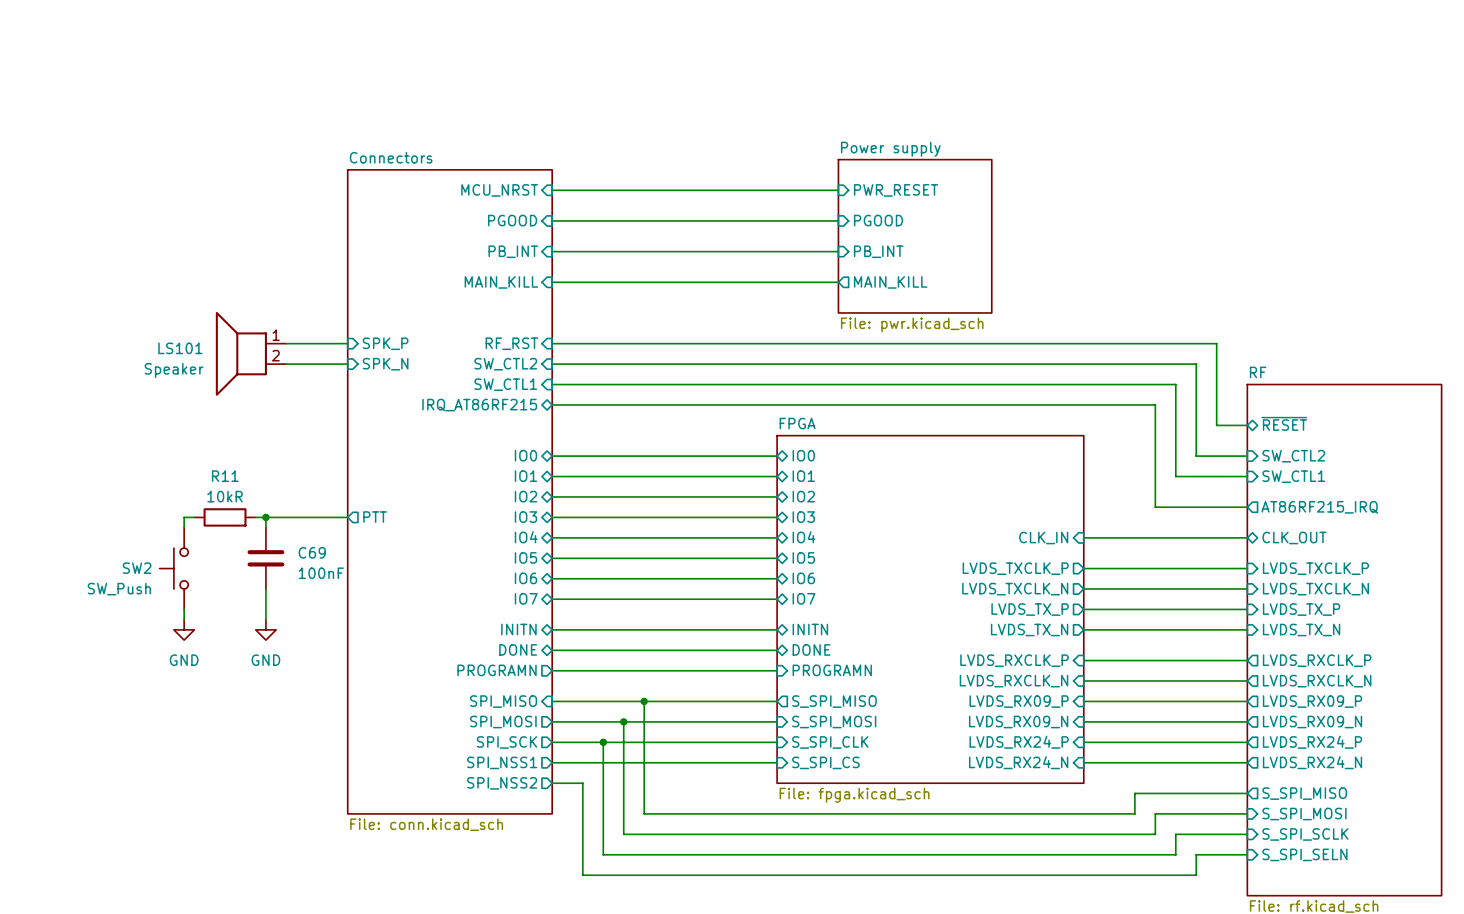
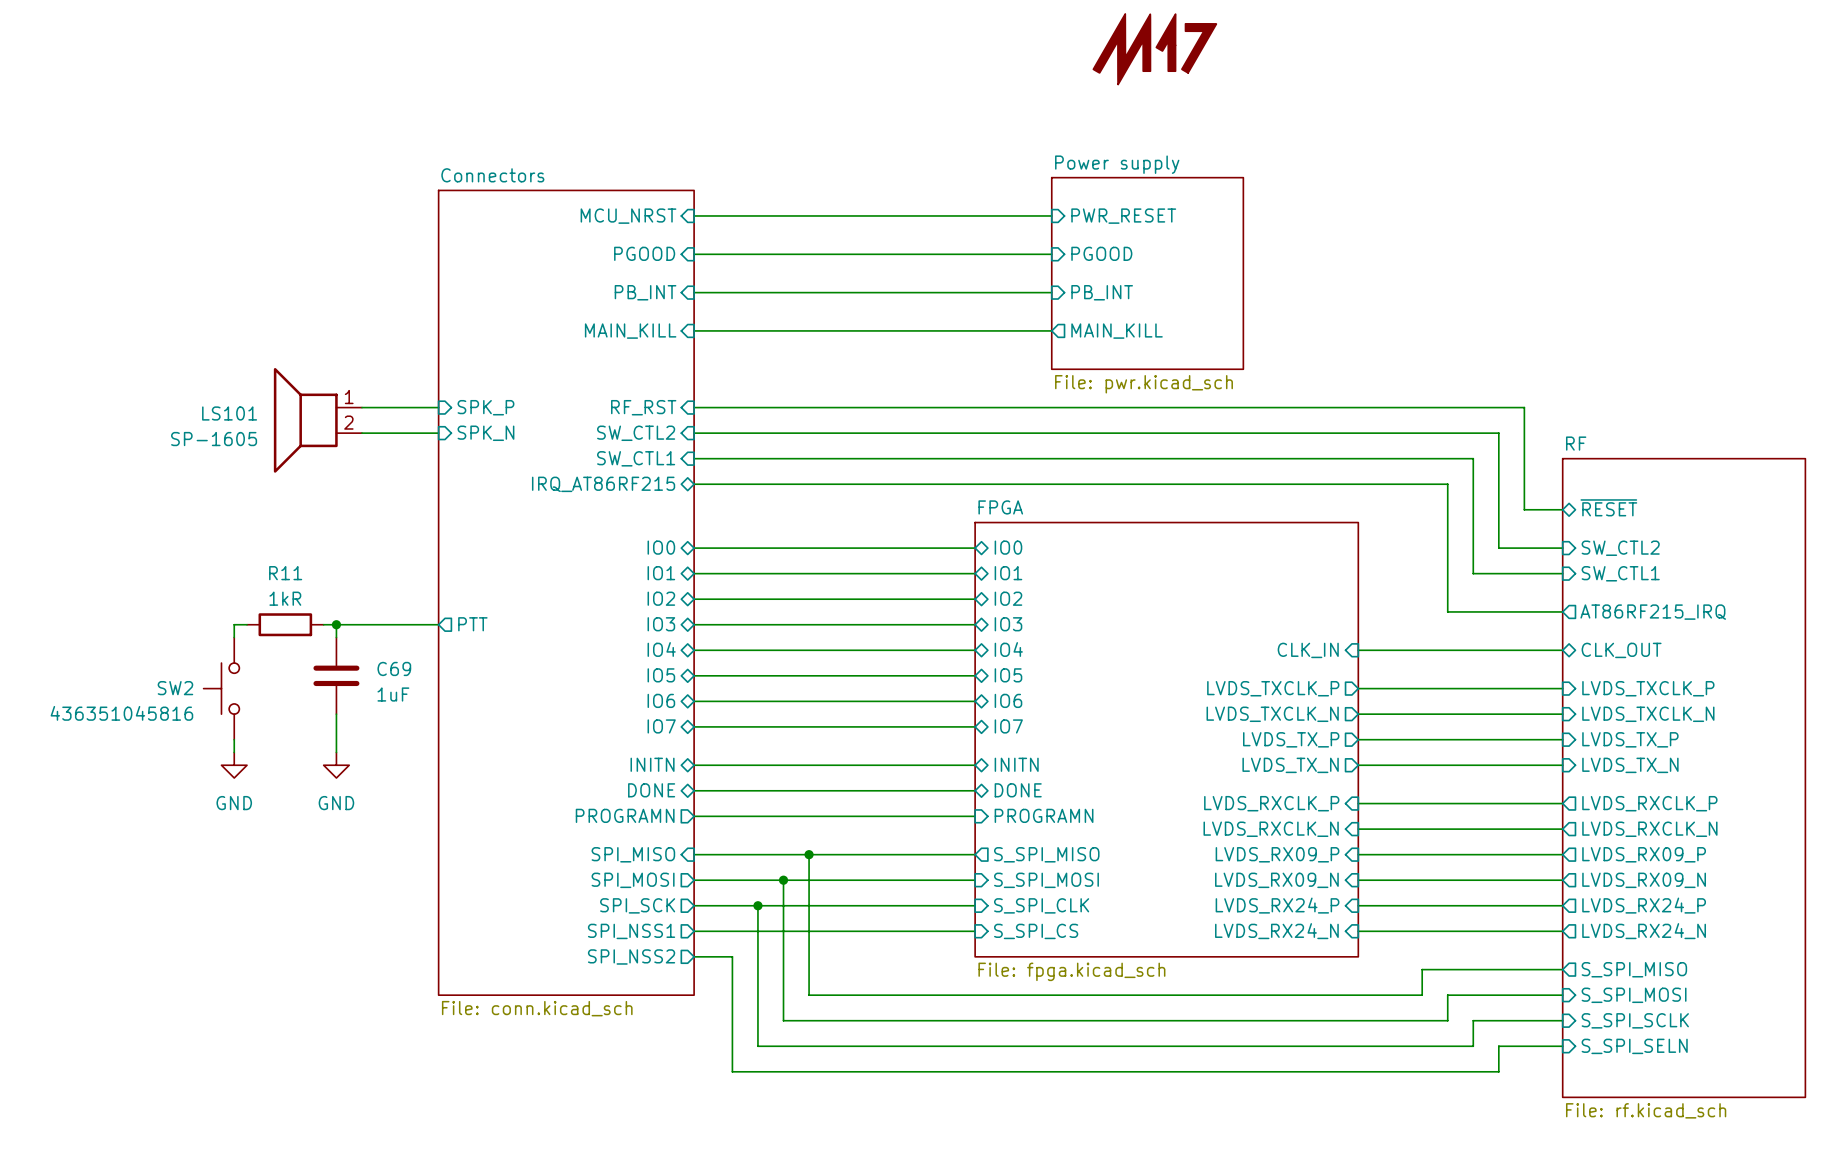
part: none -> (1154, 49)
LS101 value: Speaker (174, 370) -> SP-1605 (214, 439)
R11 value: 10kR (225, 496) -> 1kR (285, 598)
C69 value: 100nF (321, 573) -> 1uF (393, 694)
SW2 value: SW_Push (119, 589) -> 436351045816 (121, 713)

